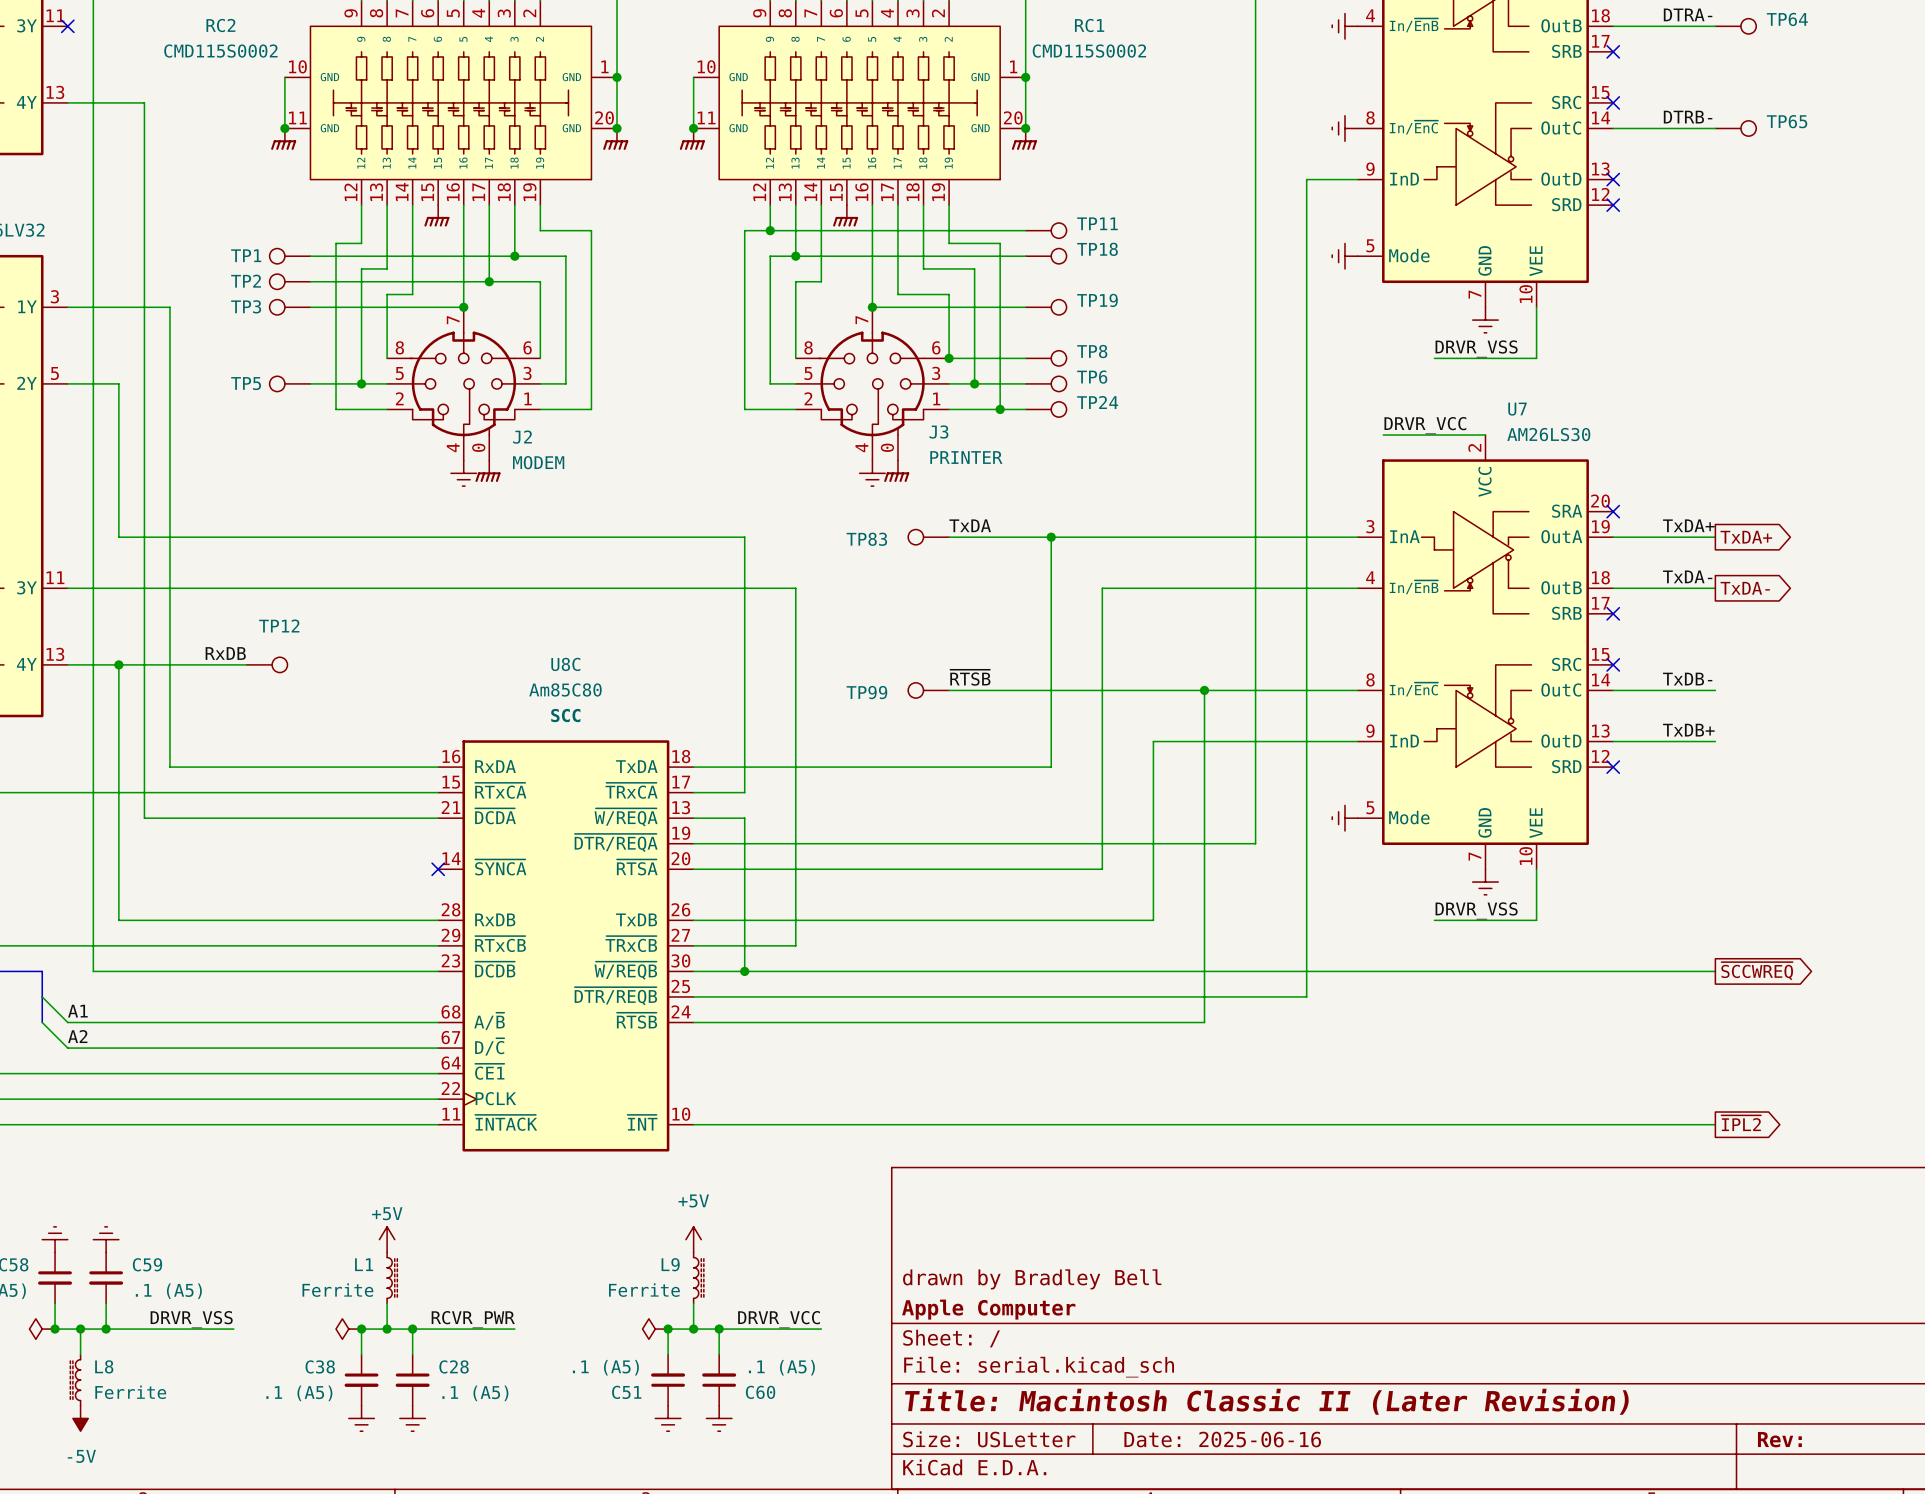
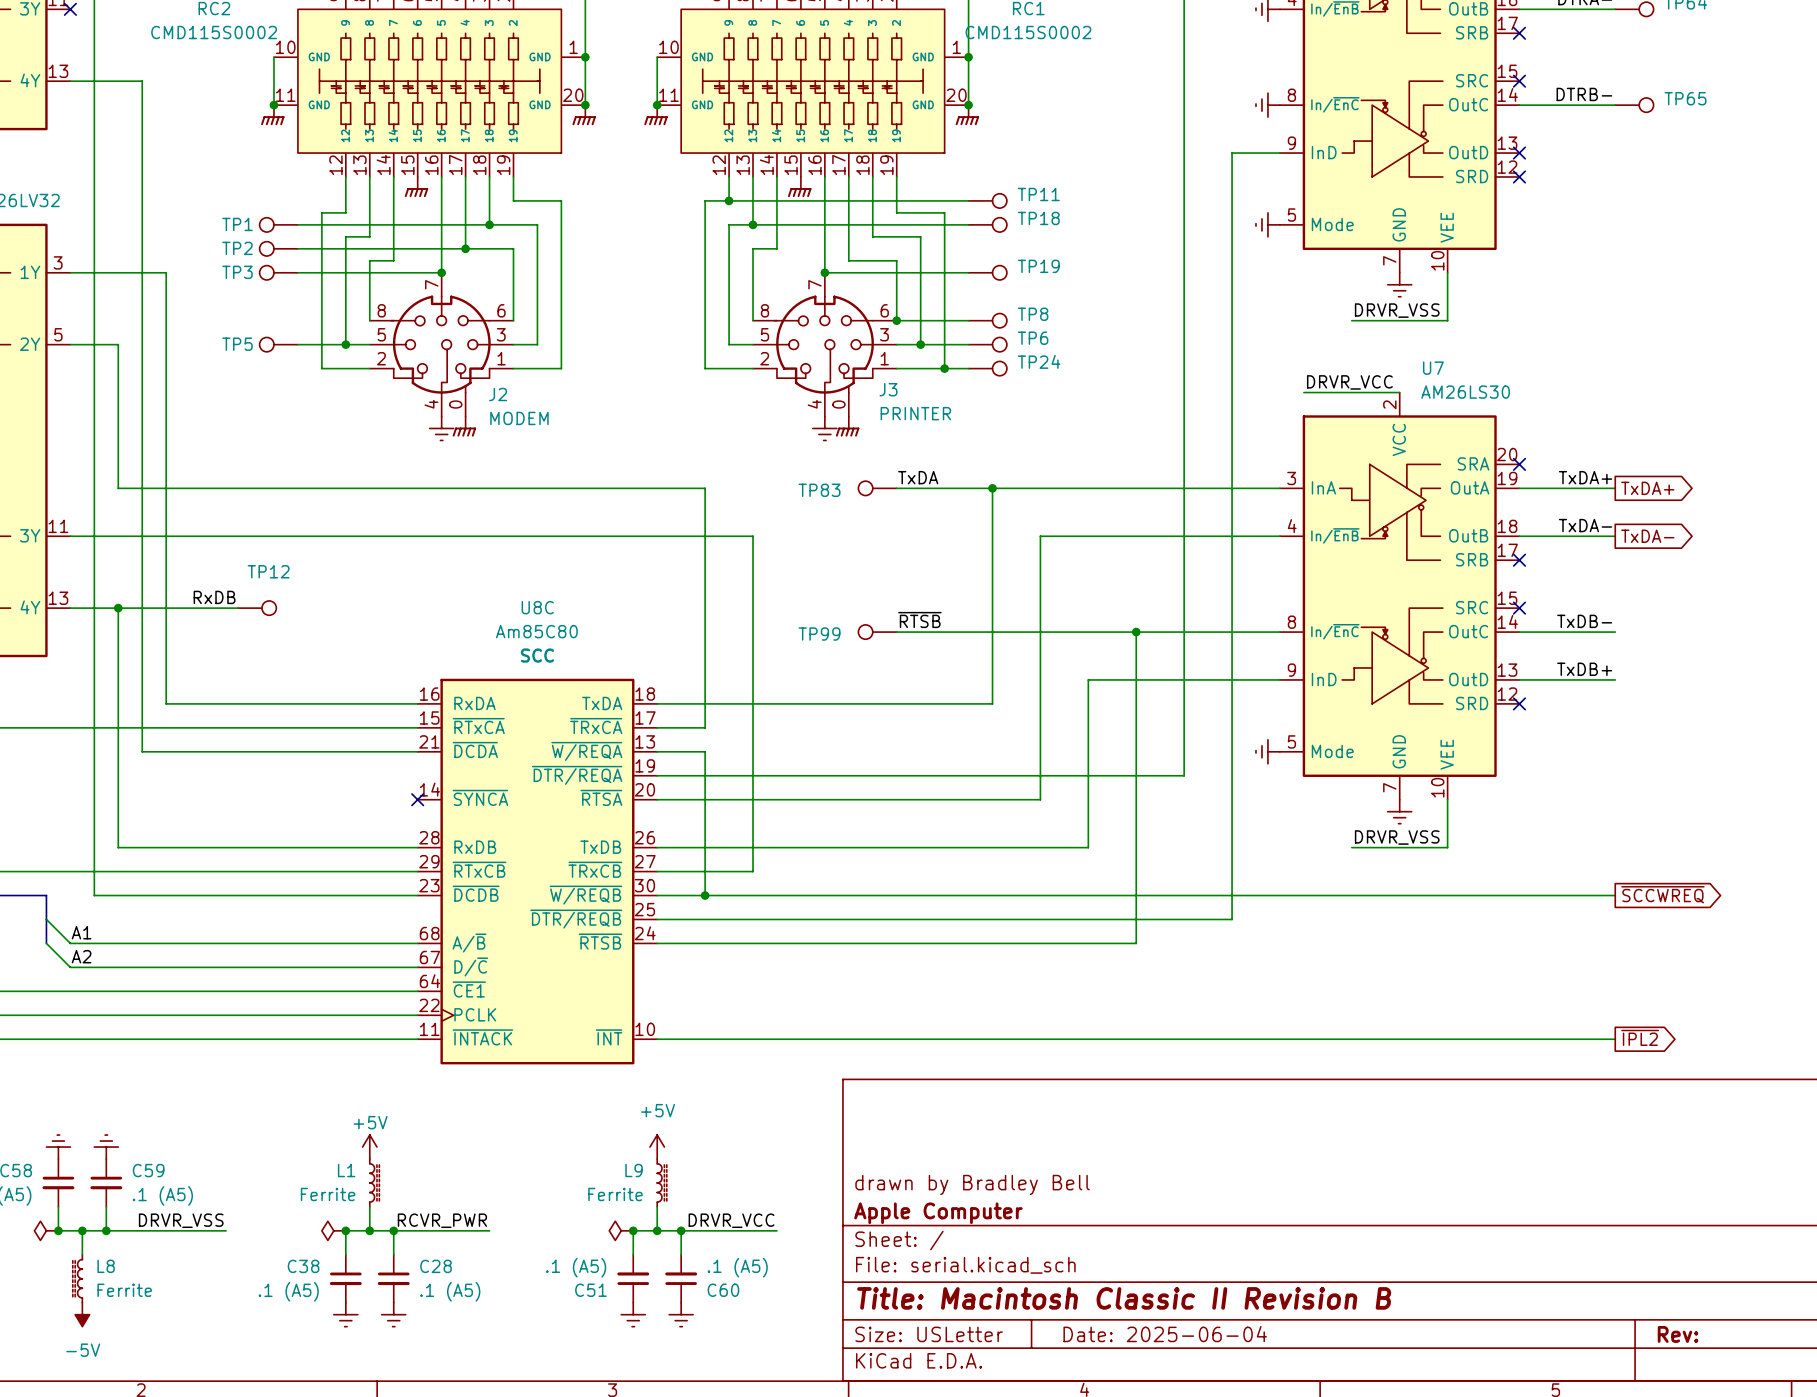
title block: Title: Macintosh Classic II (Later Revision) (1267, 1401) -> Title: Macintosh Classic II Revision B (1124, 1298)
title block: Date: 2025-06-16 (1222, 1439) -> Date: 2025-06-04 (1165, 1334)

